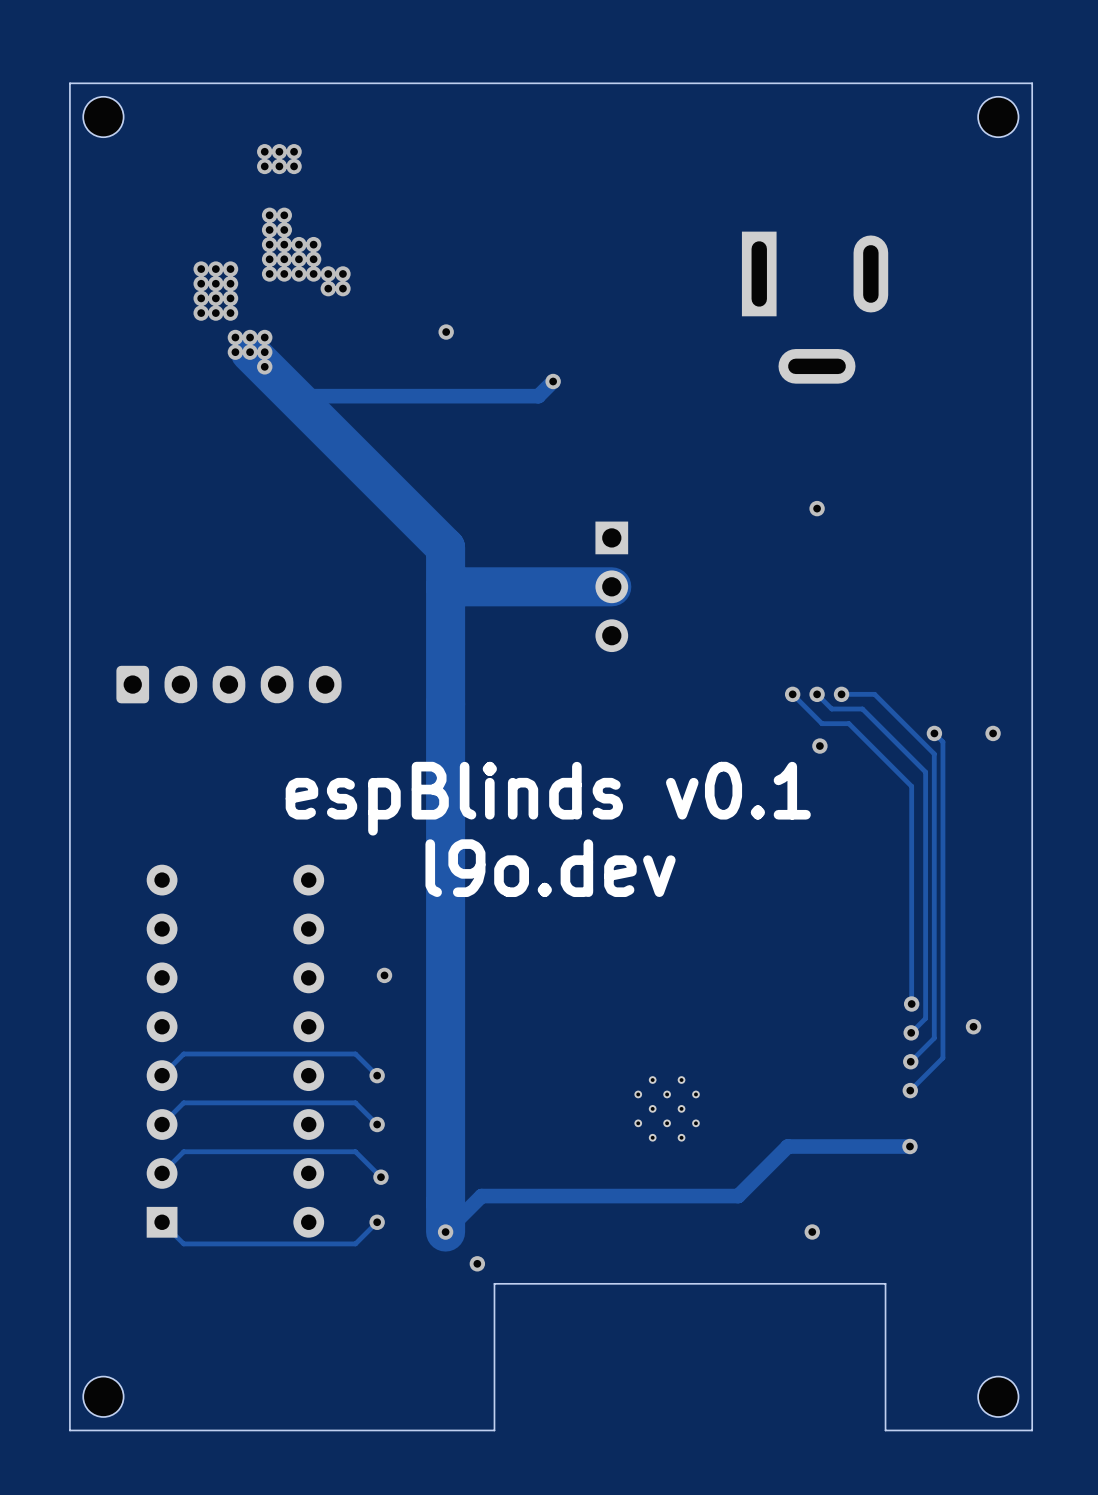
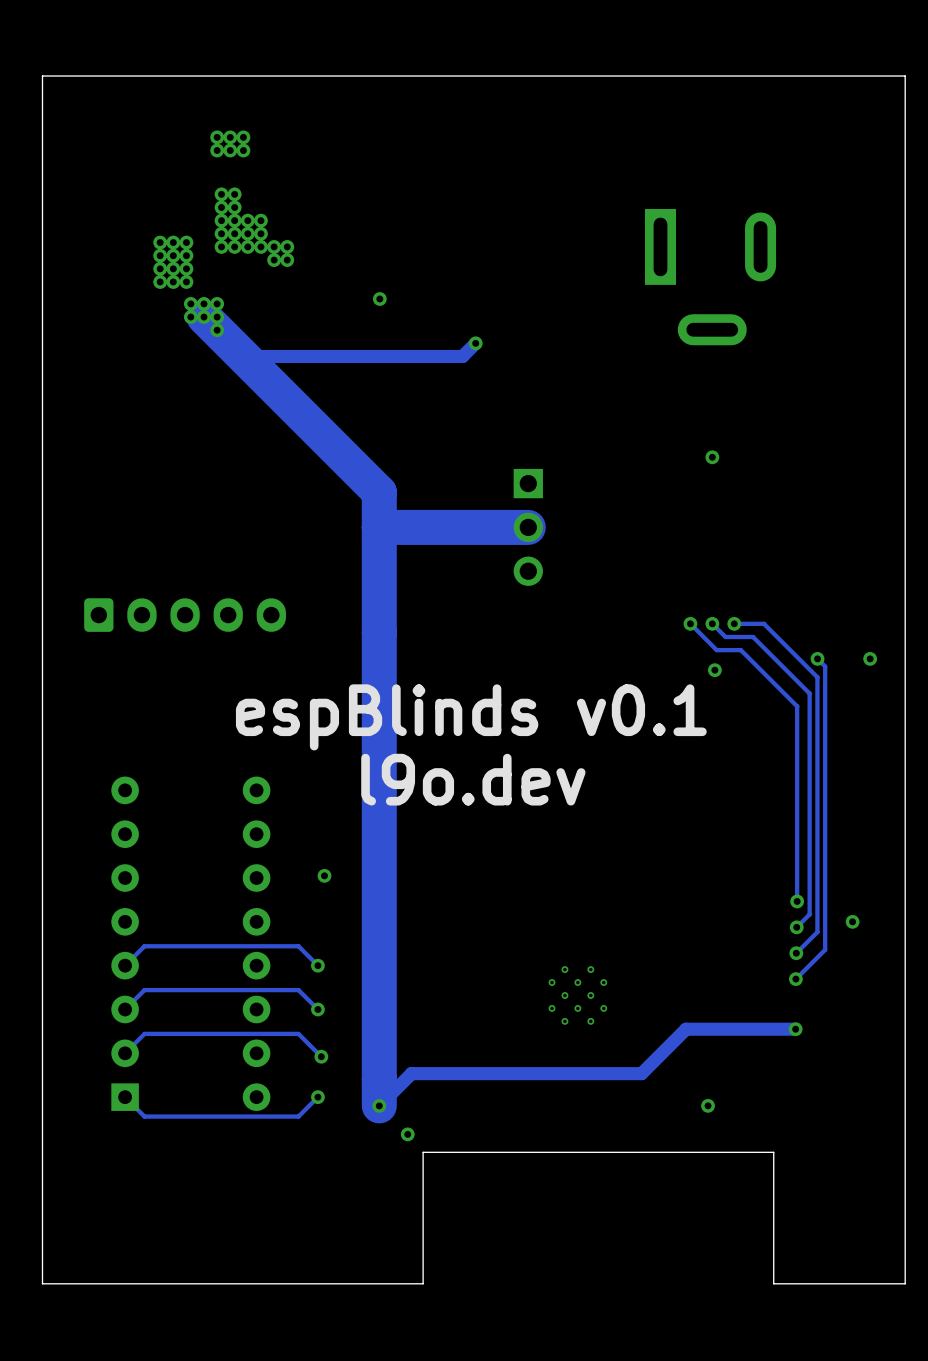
part: (103, 117) -> none
part: (998, 117) -> none
part: (103, 1396) -> none
part: (998, 1396) -> none

